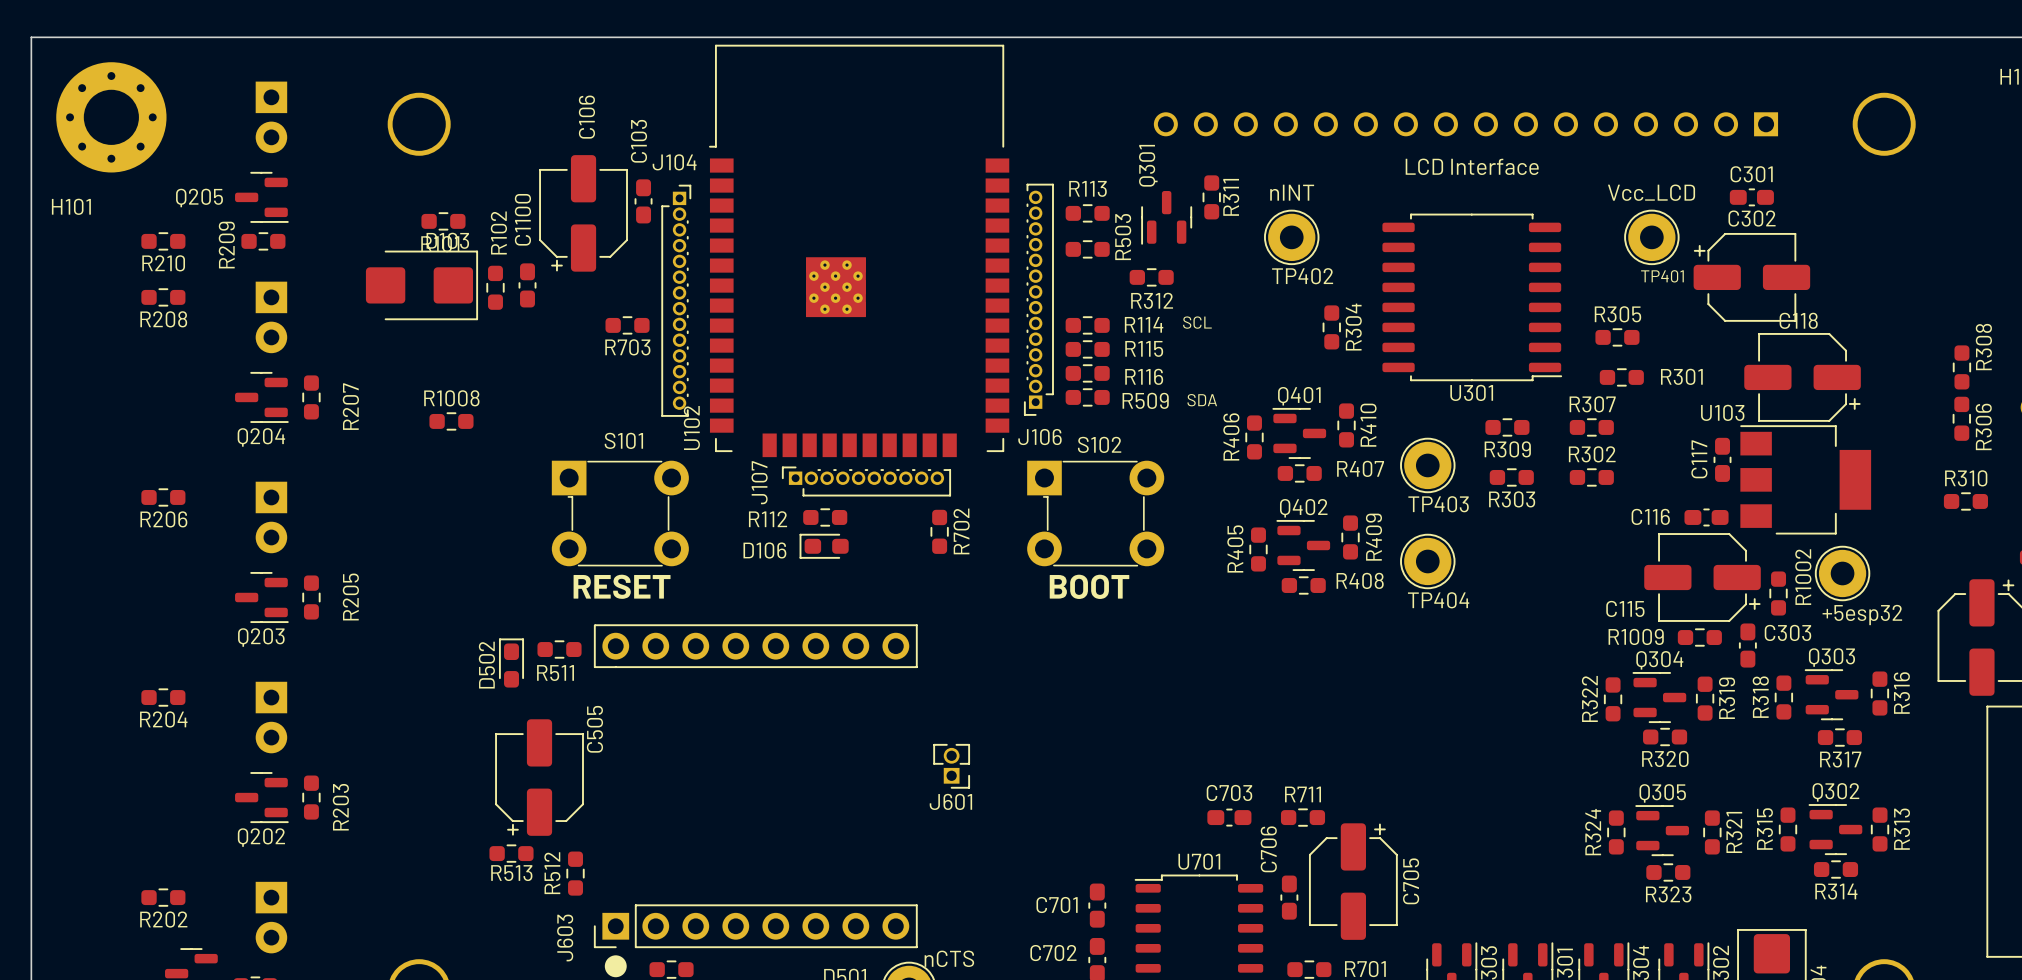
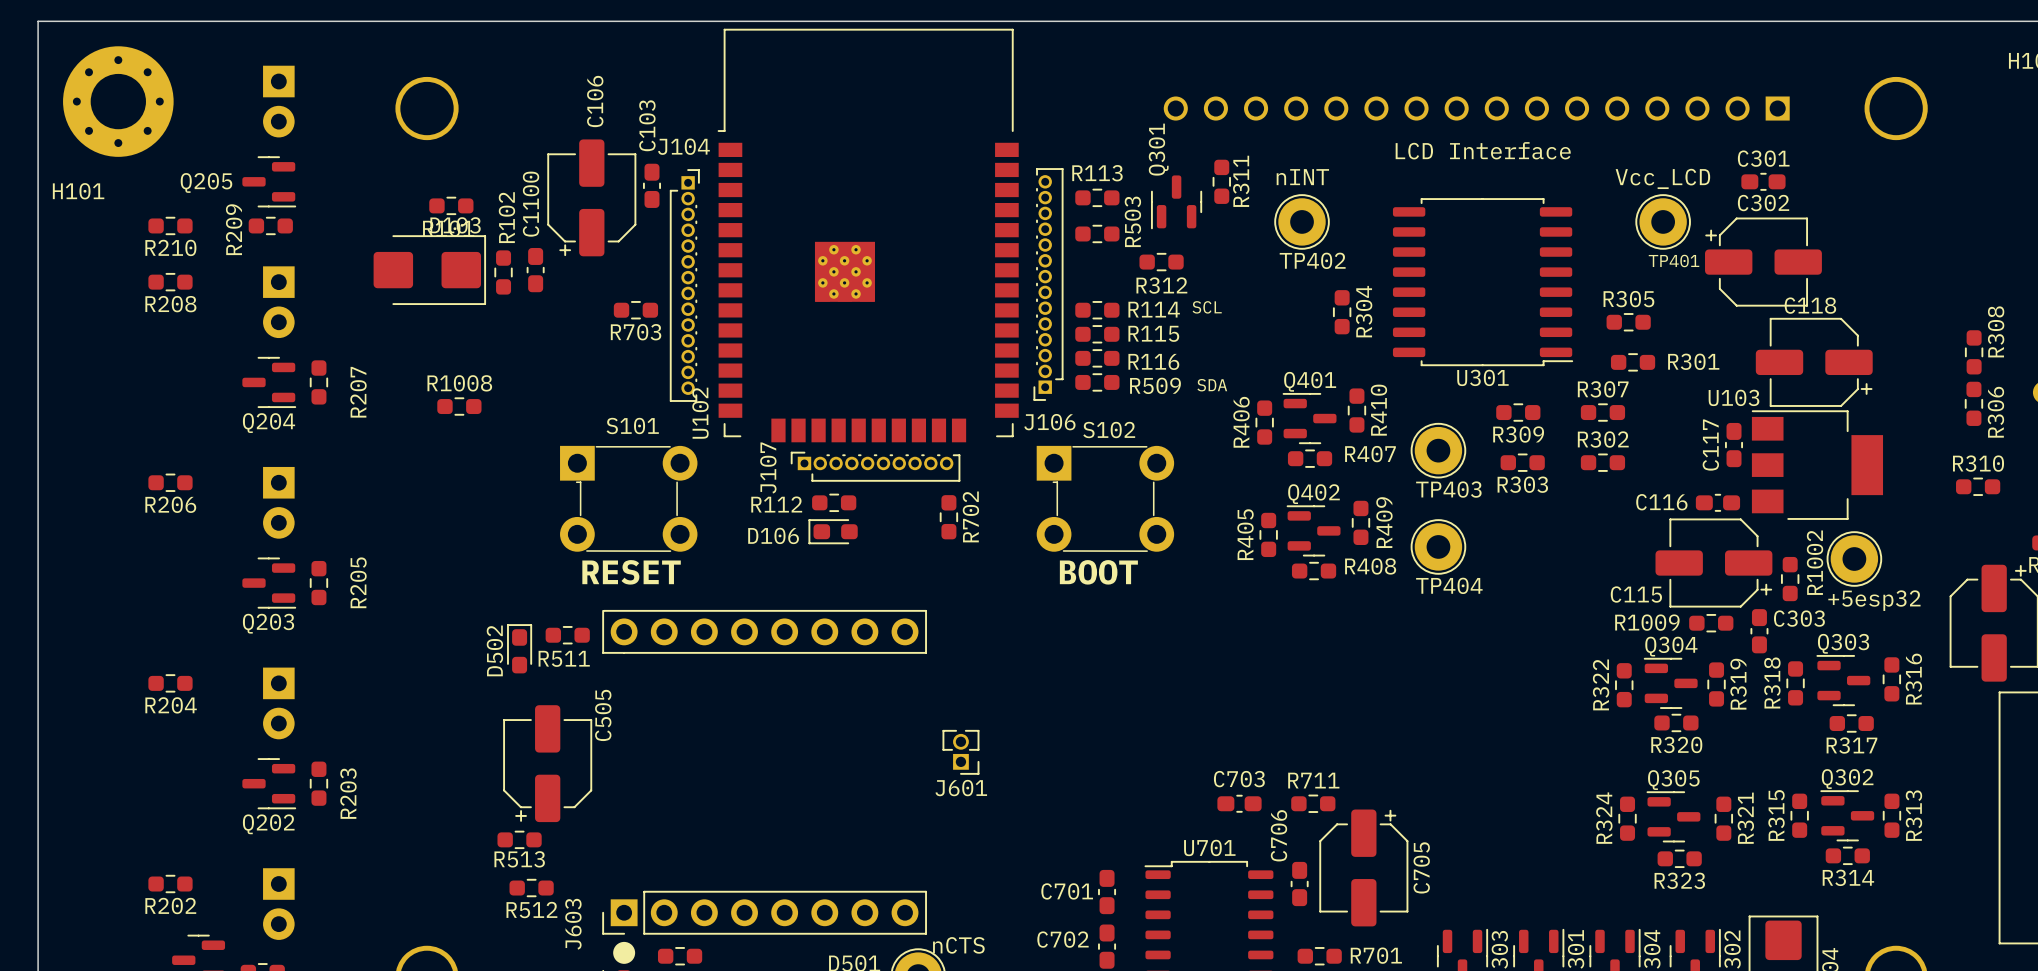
R512 name position: R512 (552, 873) -> R512 (531, 910)
R512 rotation: 0° (575, 873) -> 90° clockwise (531, 888)
R512 position: (575, 873) -> (531, 888)

